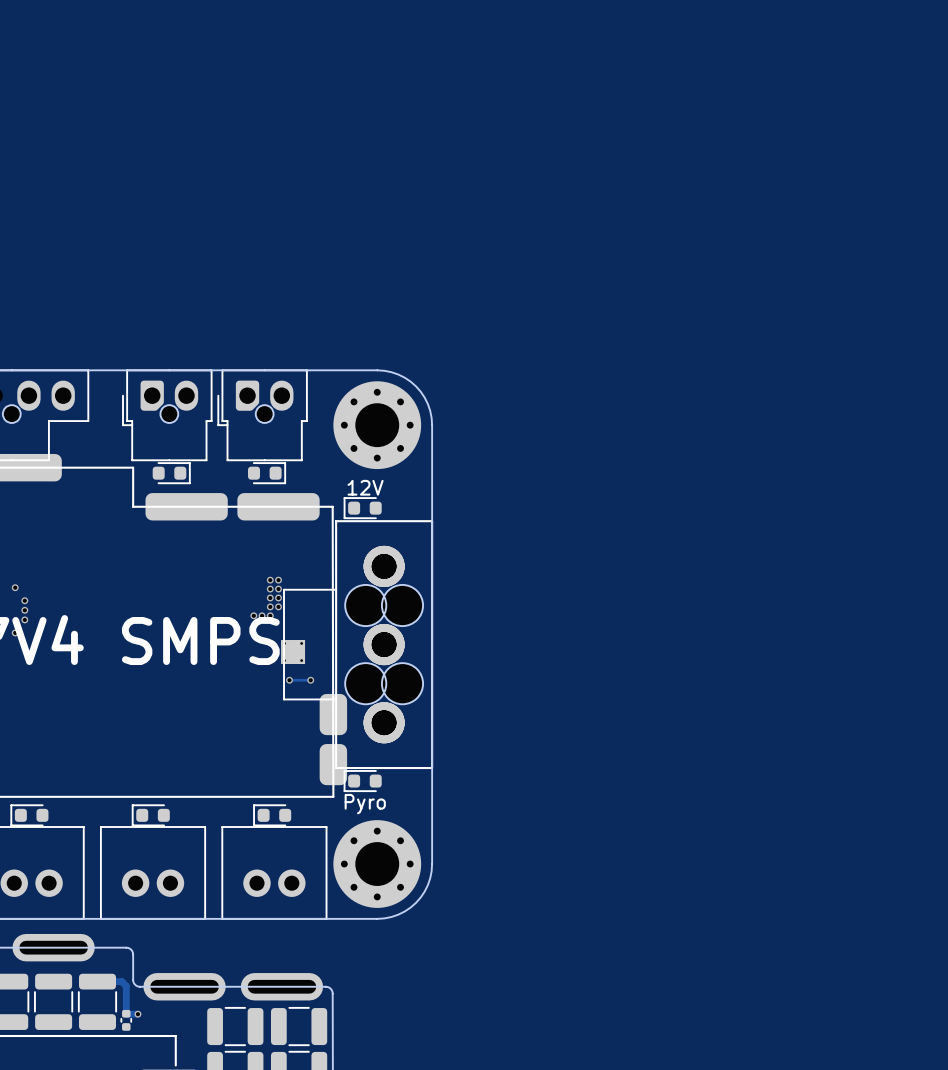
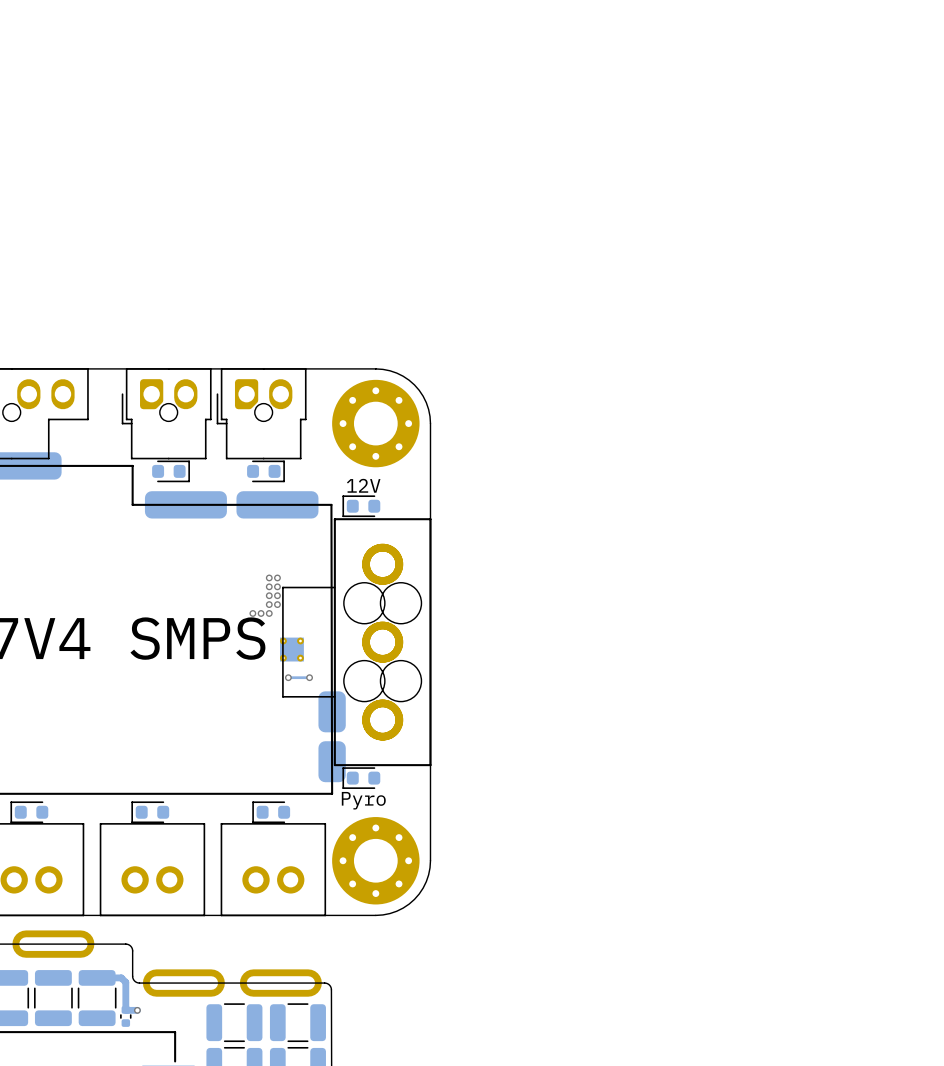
via: (15, 587) -> none
via: (24, 600) -> none
via: (24, 610) -> none
via: (24, 619) -> none
via: (15, 632) -> none

